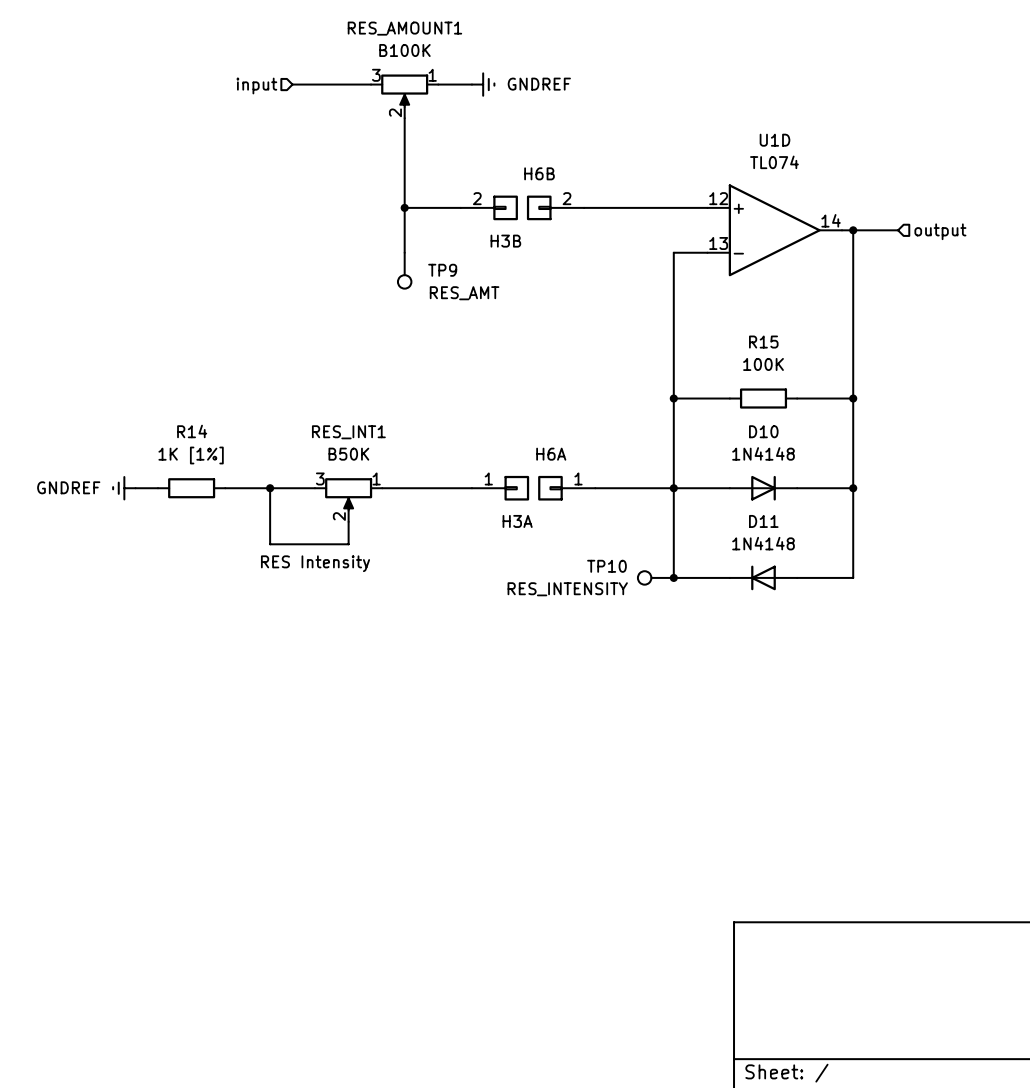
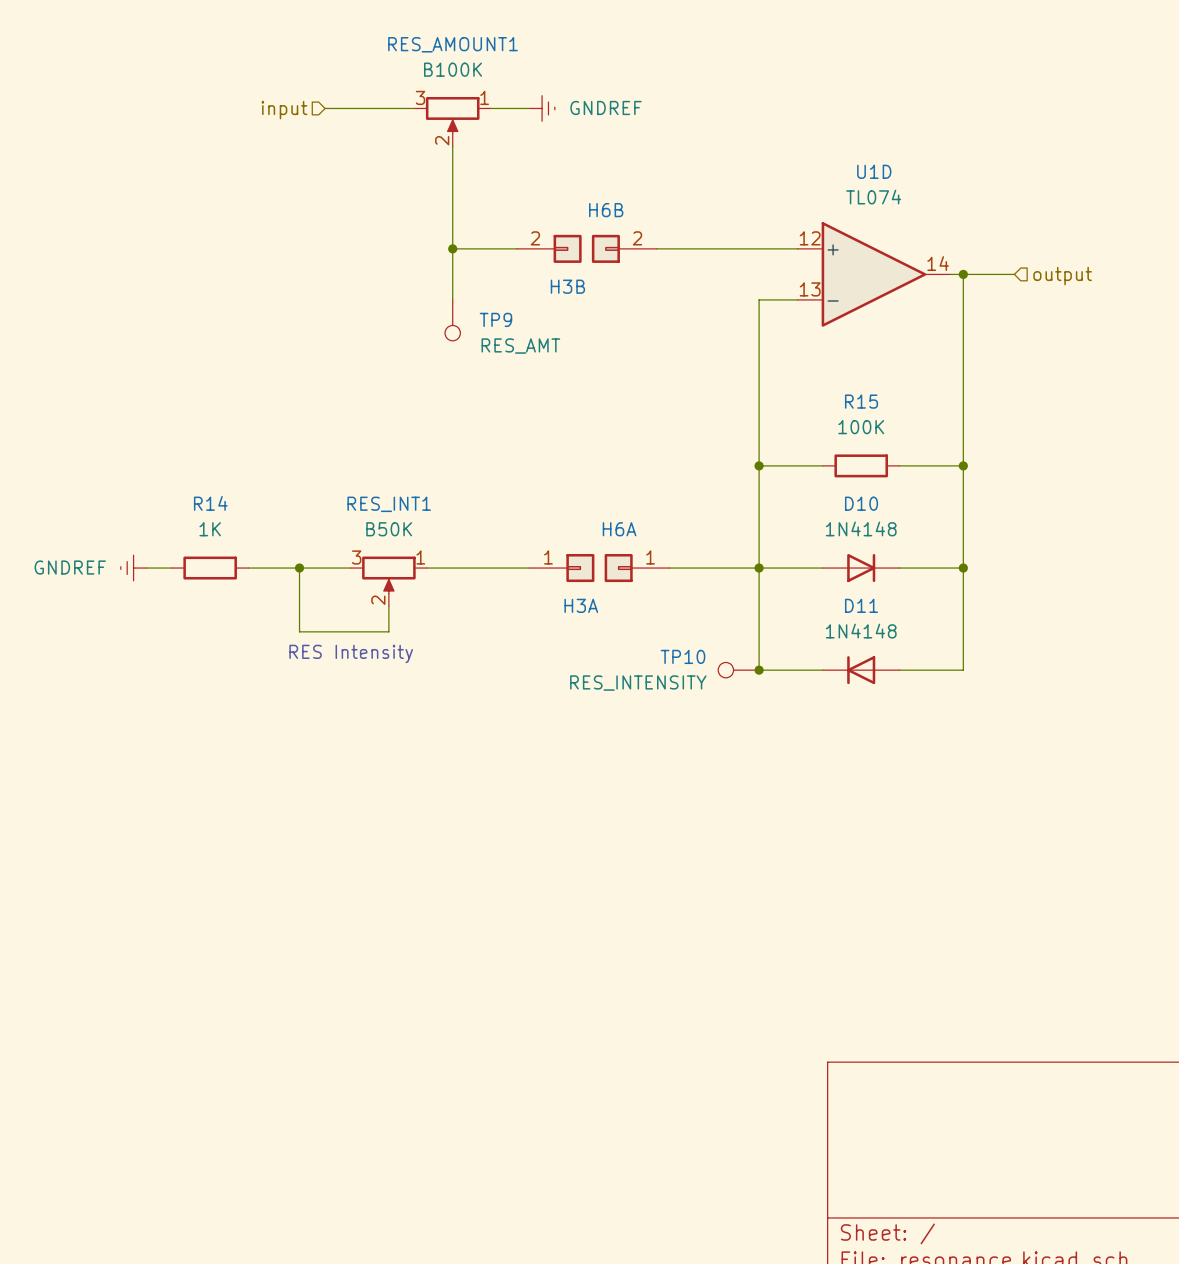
R14 value: 1K [1%] (191, 455) -> 1K (210, 529)

